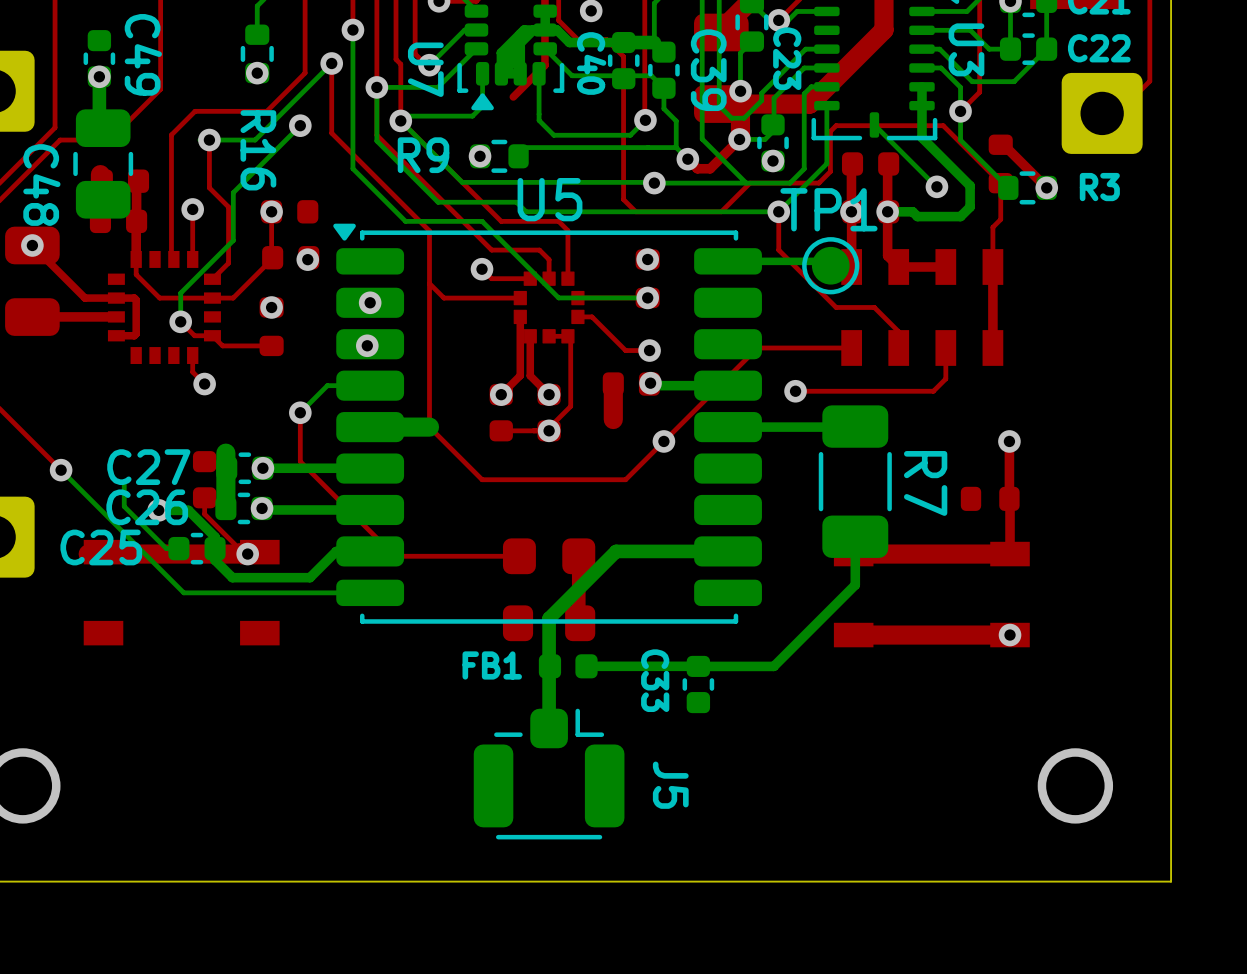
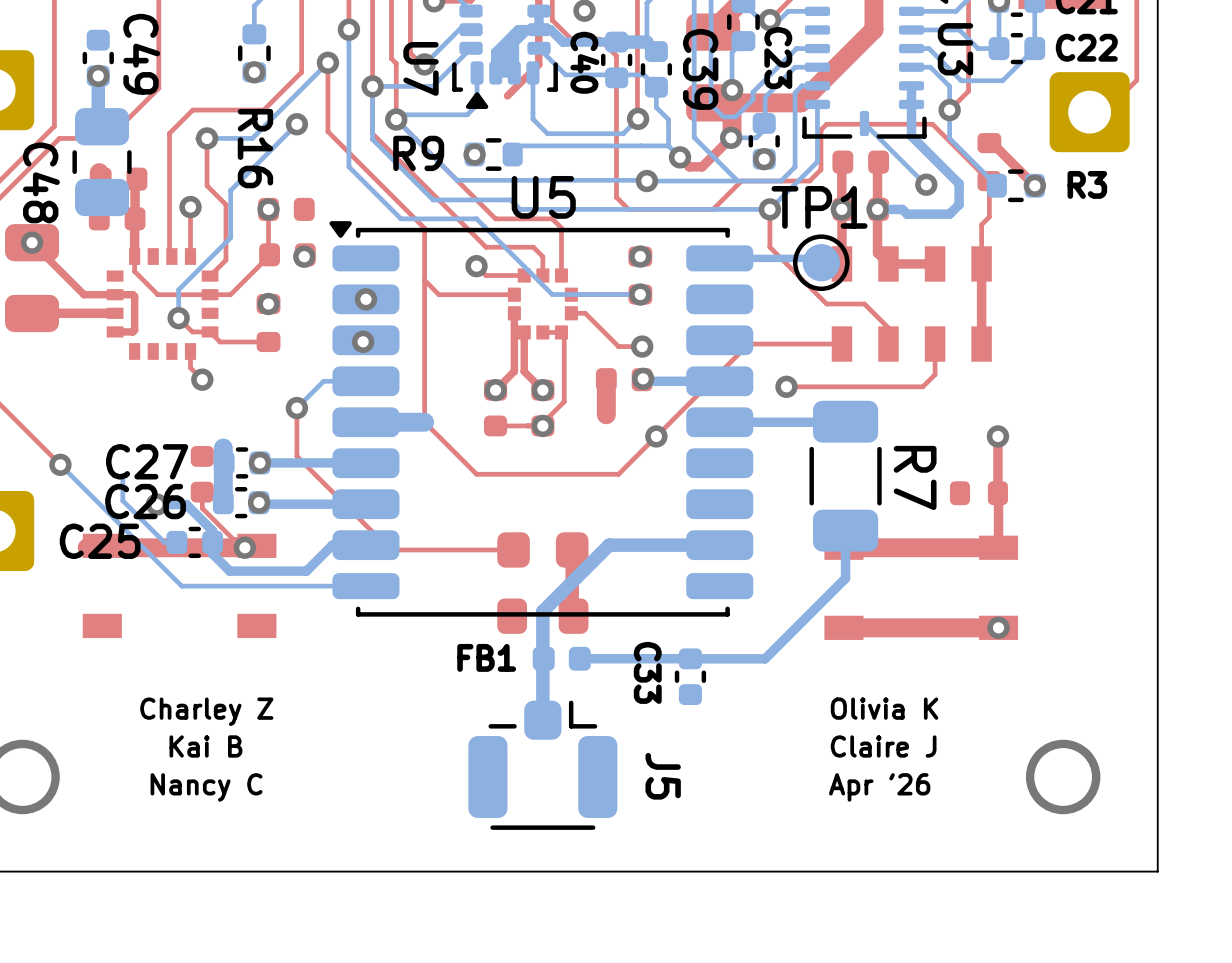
text: none -> Olivia K (884, 708)
text: none -> Charley Z (206, 711)
text: none -> Kai B (205, 746)
text: none -> Claire J (883, 746)
text: none -> Nancy C (206, 787)
text: none -> Apr '26 (879, 787)

